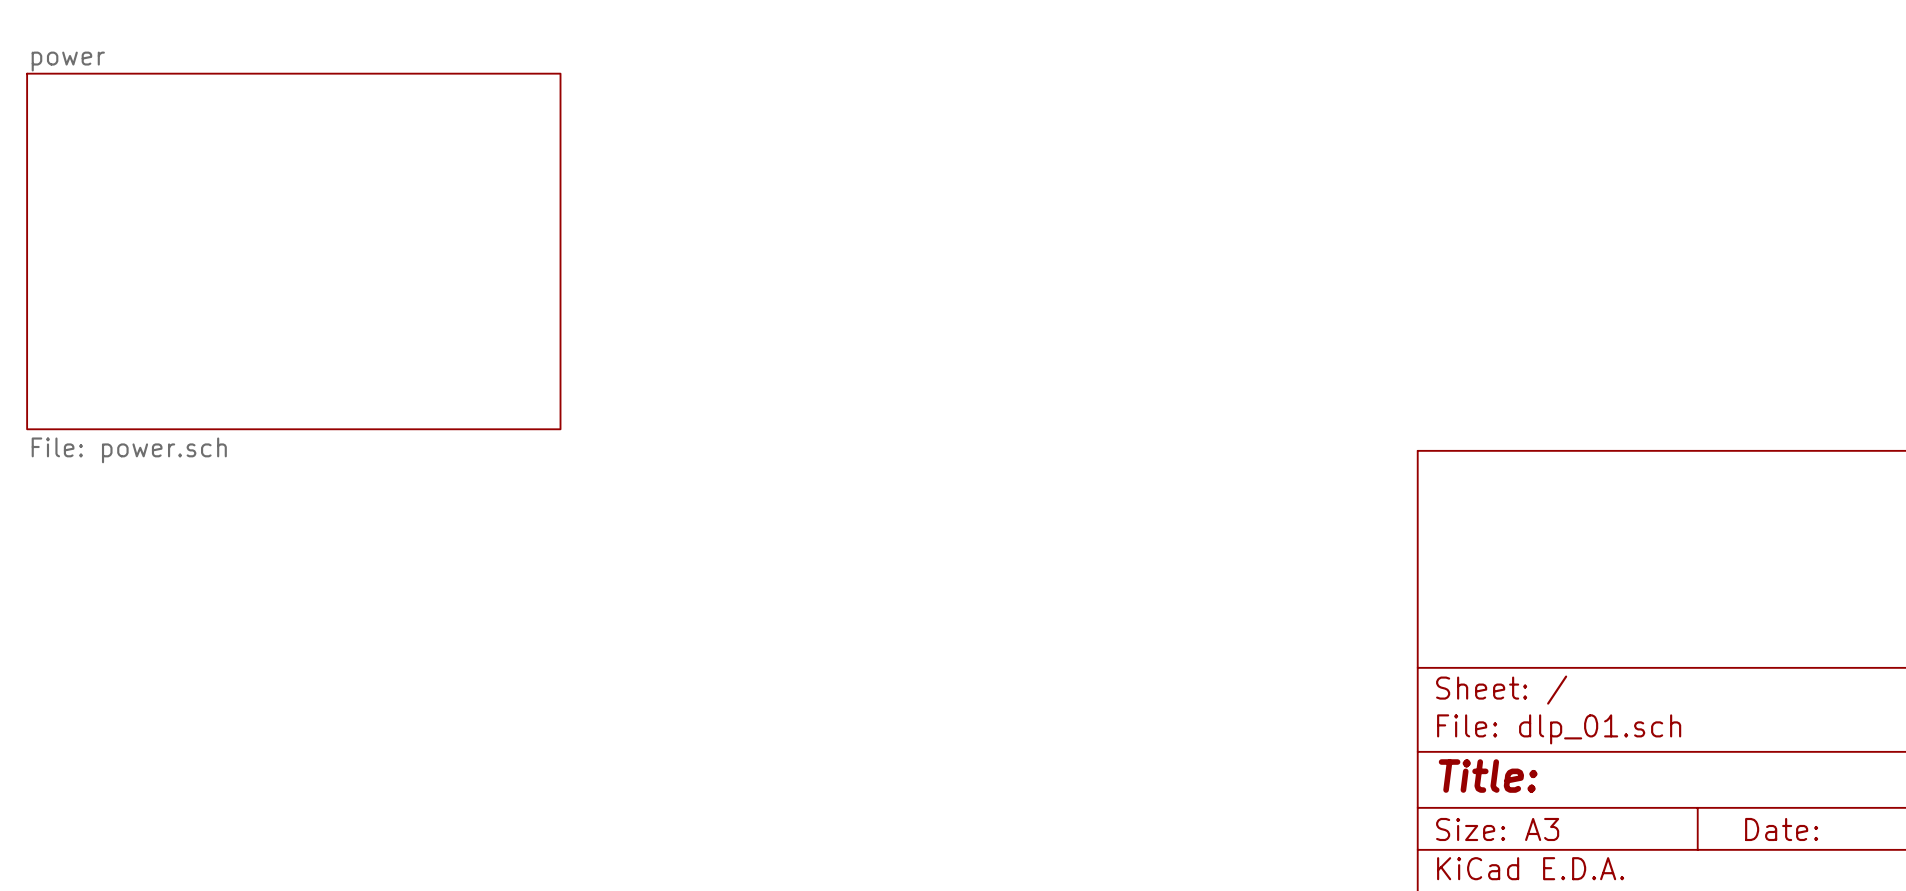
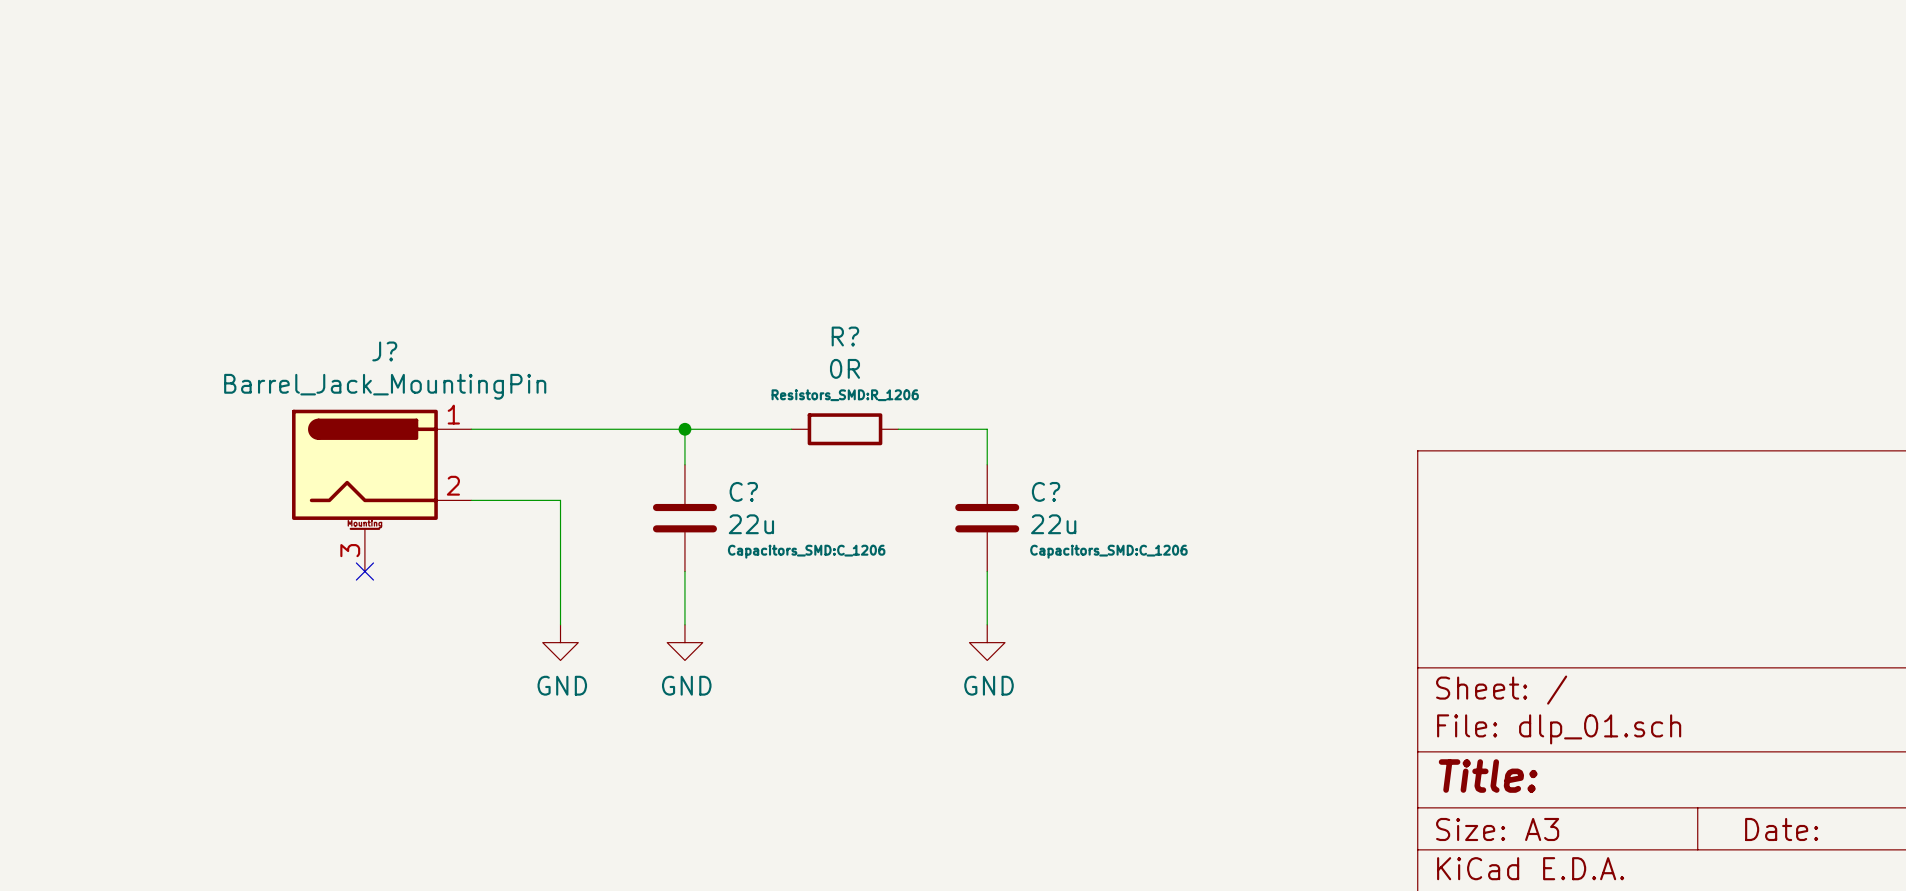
sheet power: File: power.sch (293, 251) -> none
wire: none -> (471, 429) (791, 429)
wire: none -> (684, 429) (684, 464)
junction: none -> (684, 429)
R?: none -> 0R (844, 429)
wire: none -> (898, 429) (987, 429) (987, 464)
J?: none -> Barrel_Jack_MountingPin (381, 490)
wire: none -> (471, 500) (560, 500) (560, 624)
C?: none -> 22u (684, 518)
C?: none -> 22u (987, 518)
no-connect mark: none -> (364, 571)
wire: none -> (684, 571) (684, 624)
wire: none -> (987, 571) (987, 624)
power symbol: none -> GND (560, 642)
power symbol: none -> GND (684, 642)
power symbol: none -> GND (987, 642)

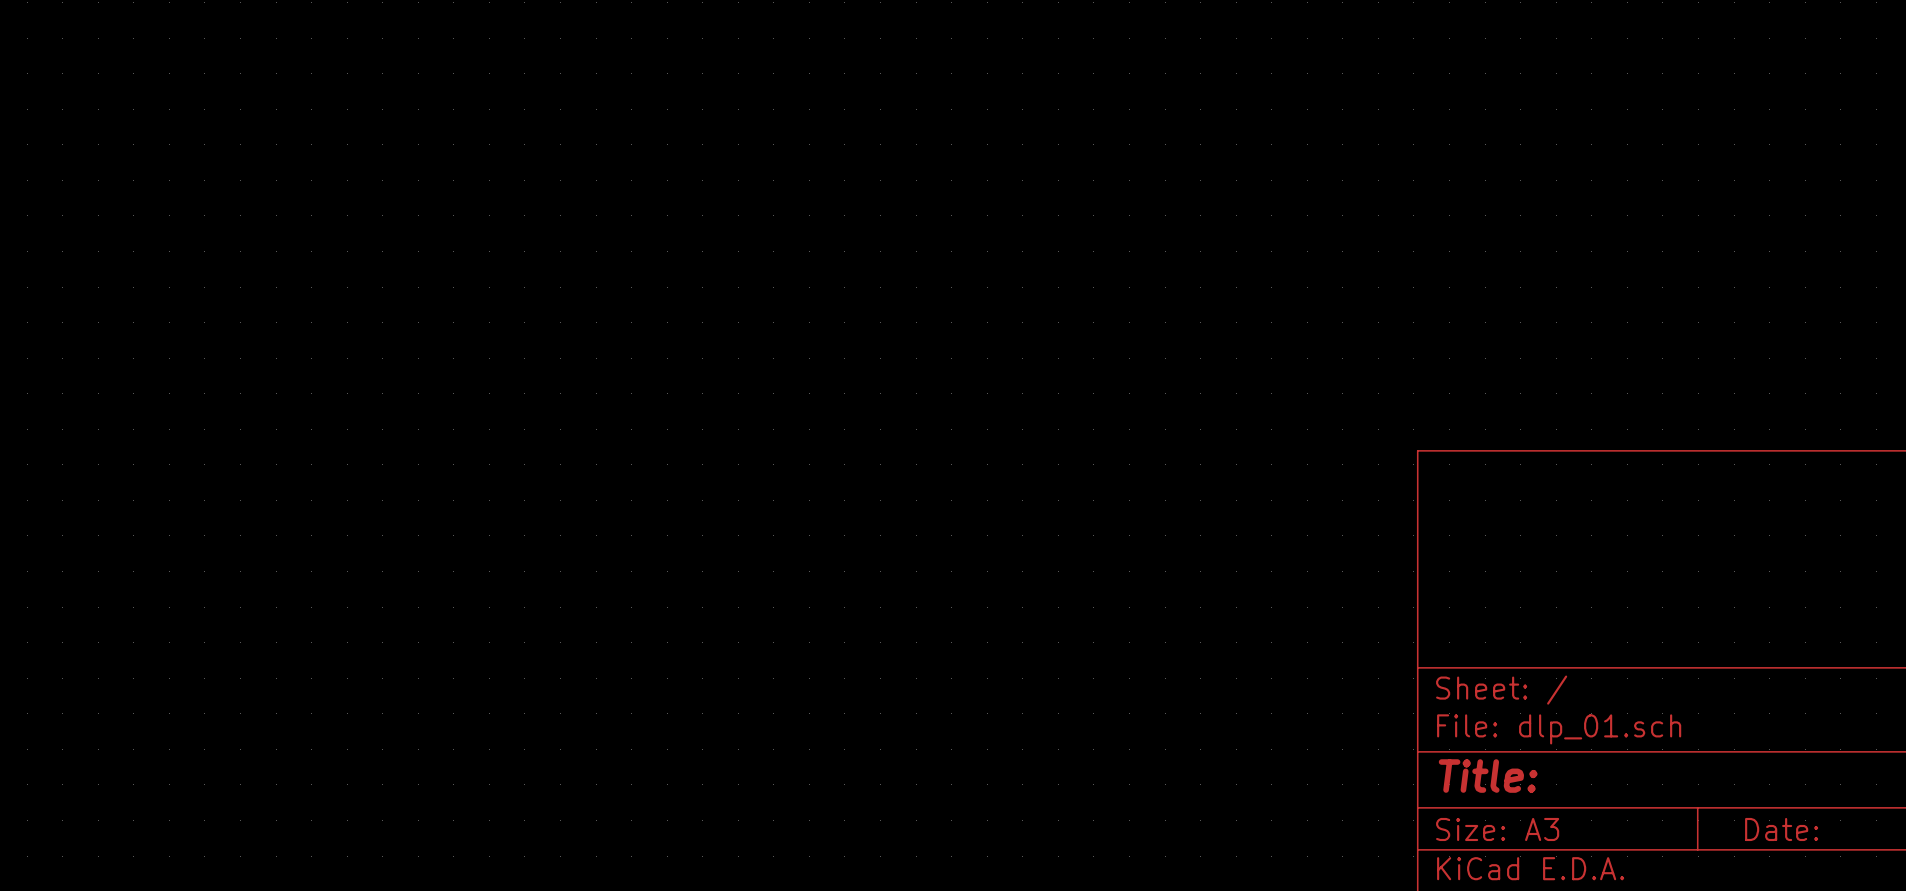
wire: (471, 429) (791, 429) -> none
wire: (684, 429) (684, 464) -> none
junction: (684, 429) -> none
R?: 0R (844, 429) -> none
wire: (898, 429) (987, 429) (987, 464) -> none
J?: Barrel_Jack_MountingPin (381, 490) -> none
wire: (471, 500) (560, 500) (560, 624) -> none
C?: 22u (684, 518) -> none
C?: 22u (987, 518) -> none
no-connect mark: (364, 571) -> none
wire: (684, 571) (684, 624) -> none
wire: (987, 571) (987, 624) -> none
power symbol: GND (560, 642) -> none
power symbol: GND (684, 642) -> none
power symbol: GND (987, 642) -> none

